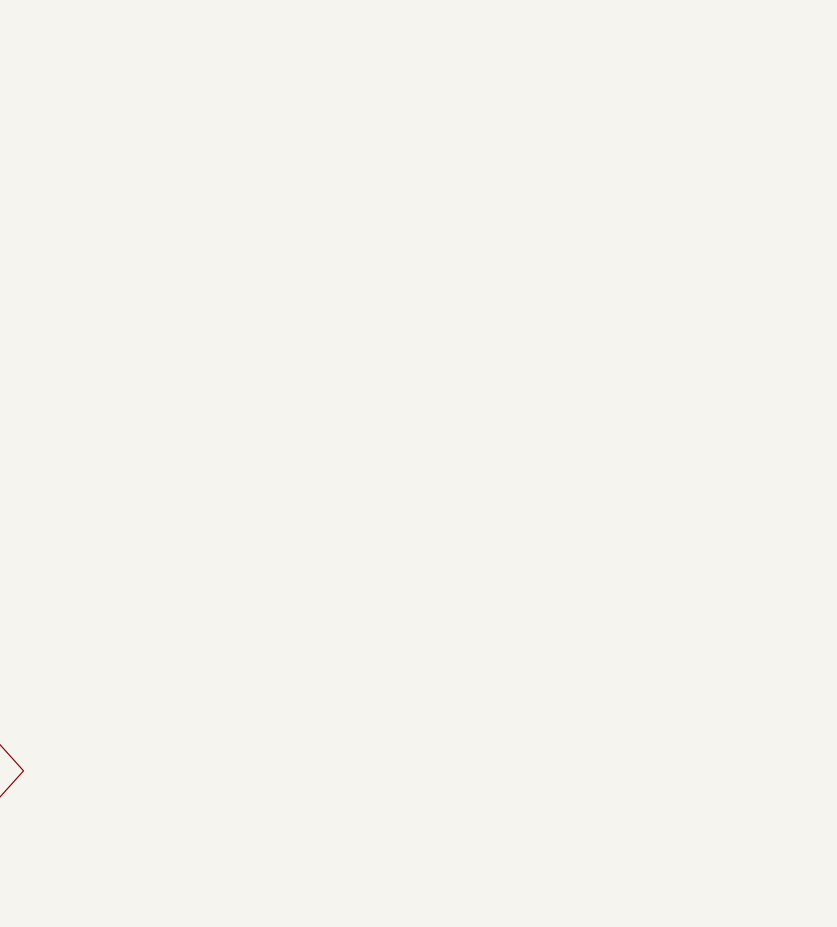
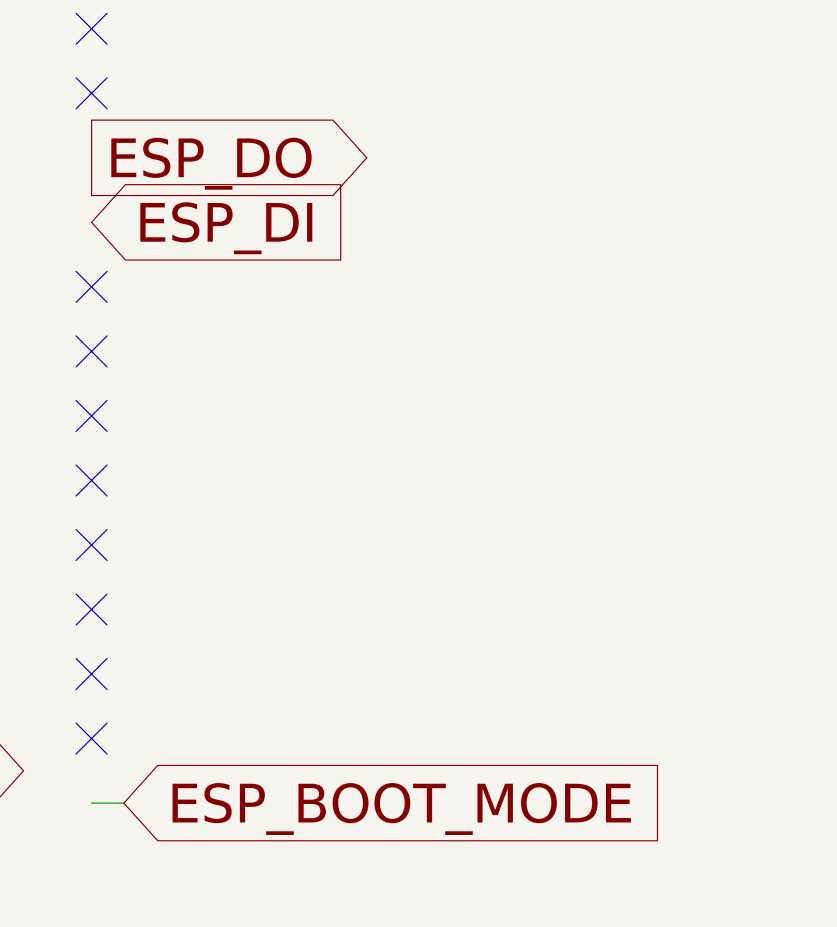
no-connect mark: none -> (91, 28)
no-connect mark: none -> (91, 93)
global label: none -> ESP_DO (211, 163)
global label: none -> ESP_DI (226, 228)
no-connect mark: none -> (91, 286)
no-connect mark: none -> (91, 351)
no-connect mark: none -> (91, 415)
no-connect mark: none -> (91, 480)
no-connect mark: none -> (91, 544)
no-connect mark: none -> (91, 609)
no-connect mark: none -> (91, 674)
no-connect mark: none -> (91, 738)
wire: none -> (91, 803) (123, 803)
global label: none -> ESP_BOOT_MODE (401, 809)

